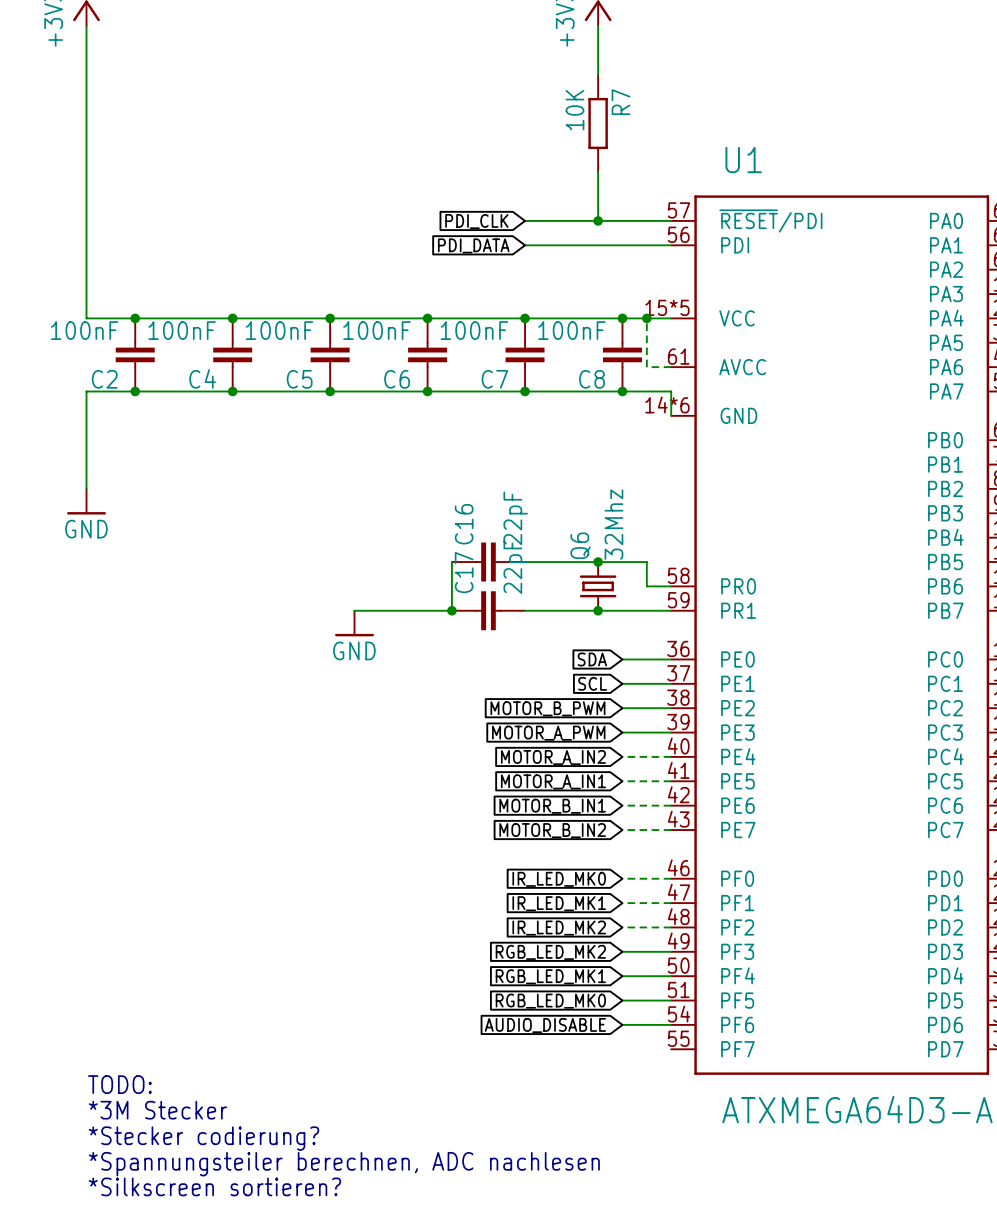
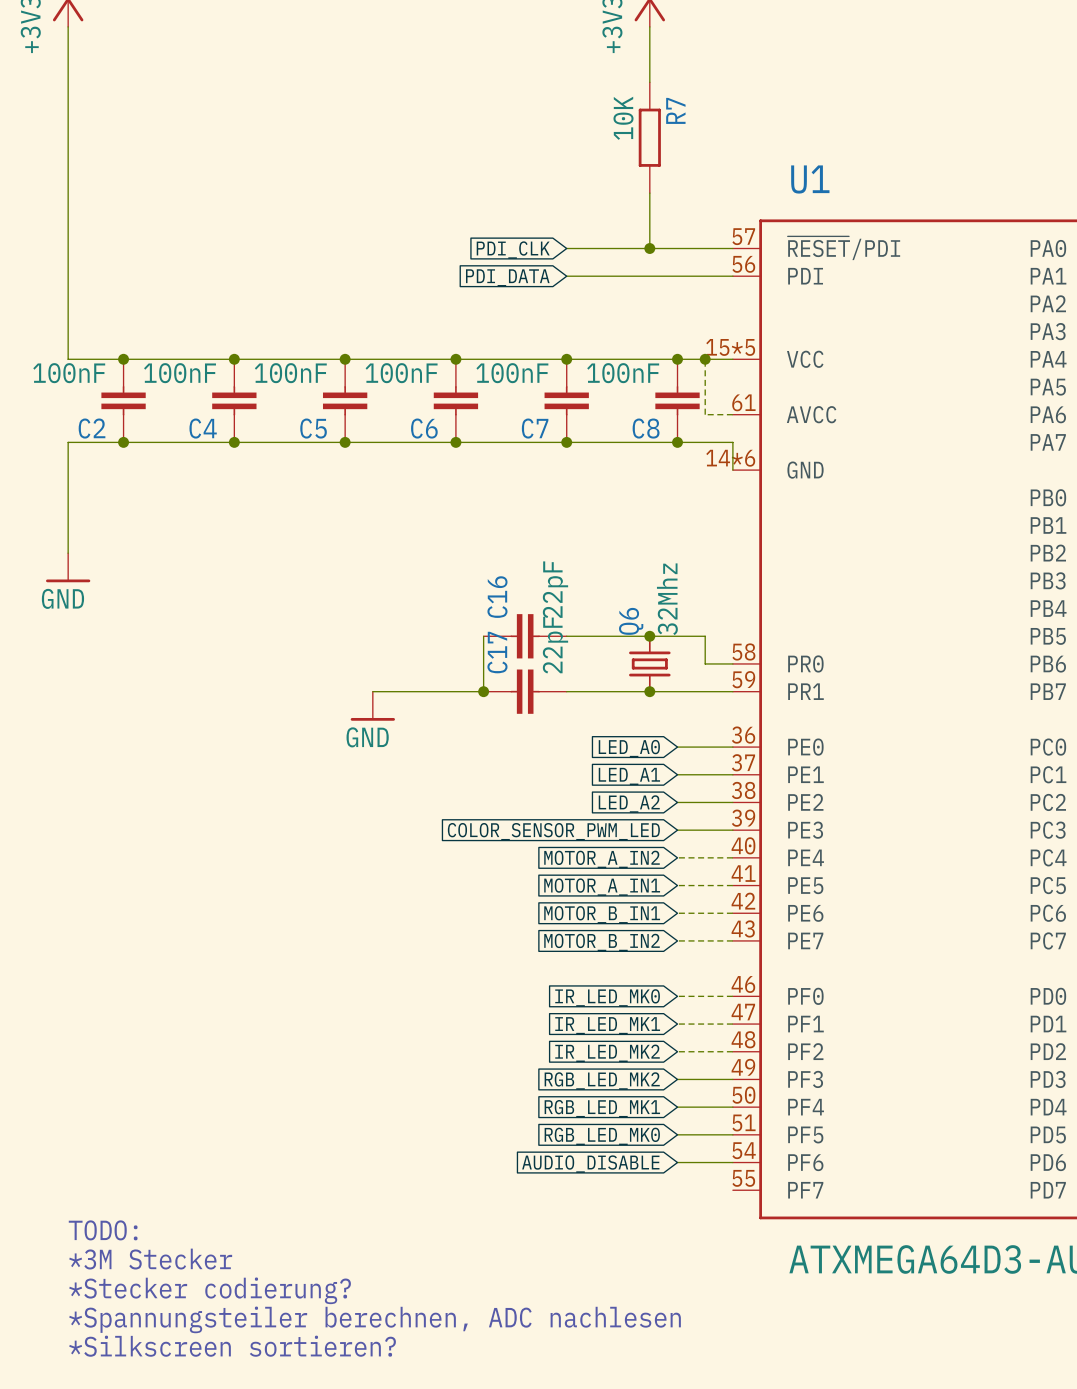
global label: SDA (592, 659) -> LED_A0 (629, 748)
global label: SCL (592, 683) -> LED_A1 (629, 776)
global label: MOTOR_B_PWM (547, 708) -> LED_A2 (629, 804)
global label: MOTOR_A_PWM (548, 733) -> COLOR_SENSOR_PWM_LED (553, 831)

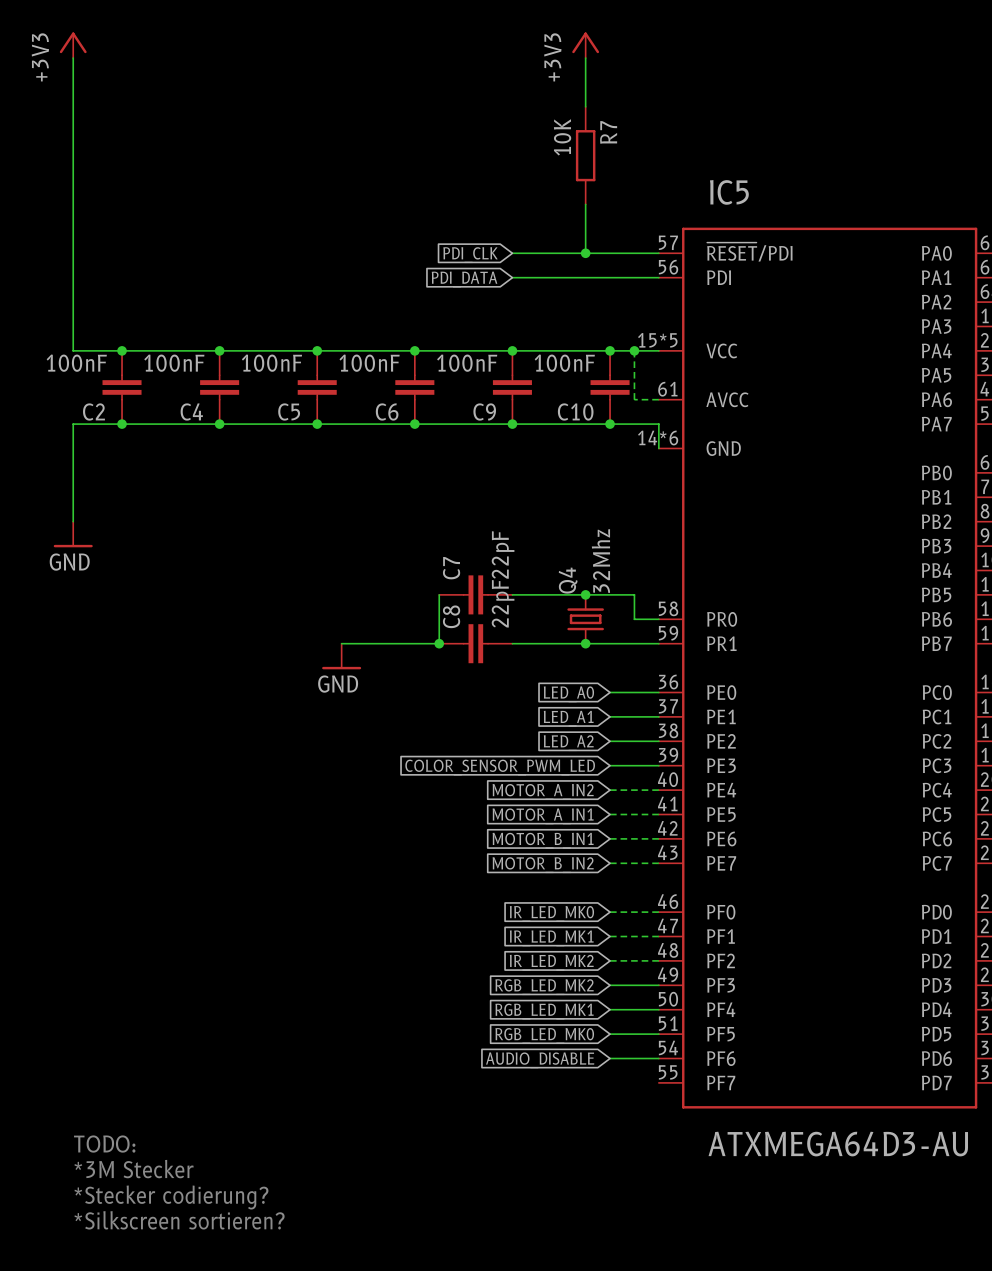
U1 name: U1 (810, 179) -> IC5 (729, 192)
C7 name: C7 (535, 428) -> C9 (484, 411)
C8 name: C8 (646, 428) -> C10 (575, 411)
C16 name: C16 (497, 597) -> C7 (451, 568)
Q6 name: Q6 (631, 621) -> Q4 (568, 580)
C17 name: C17 (497, 652) -> C8 (451, 616)
text: TODO: (103, 1230) -> none
text: *3M Stecker (150, 1259) -> TODO: (104, 1144)
text: *Stecker codierung? (210, 1290) -> *3M Stecker (134, 1169)
text: *Spannungsteiler berechnen, ADC nachlesen (375, 1319) -> *Stecker codierung? (171, 1197)

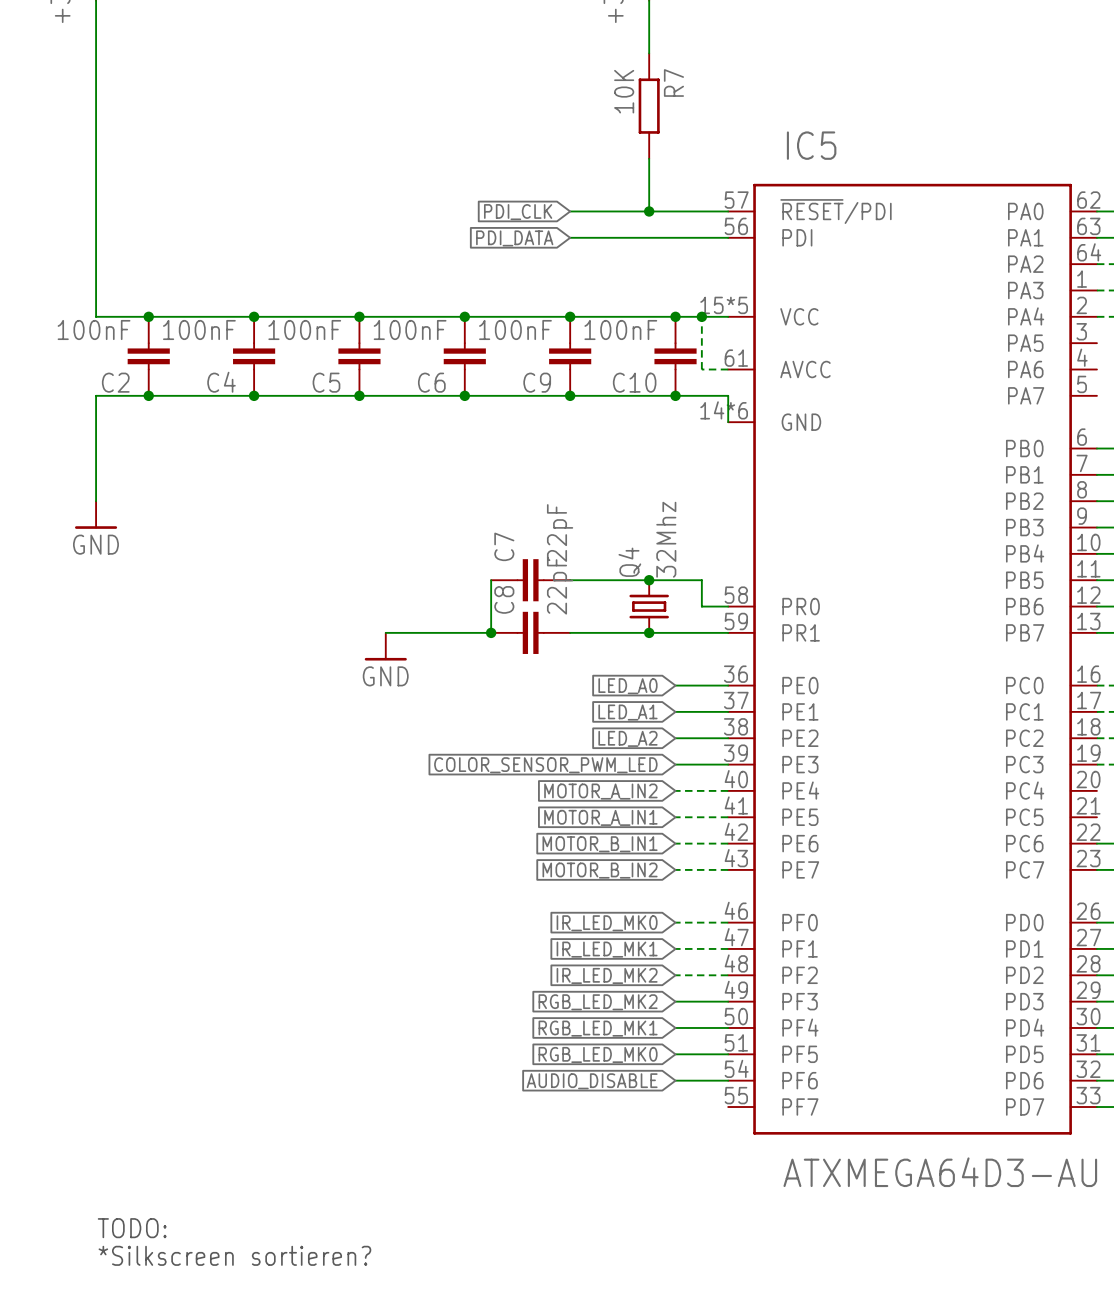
text: TODO: (104, 1144) -> none
text: *3M Stecker (134, 1169) -> none
text: *Stecker codierung? (171, 1197) -> TODO: (132, 1228)

